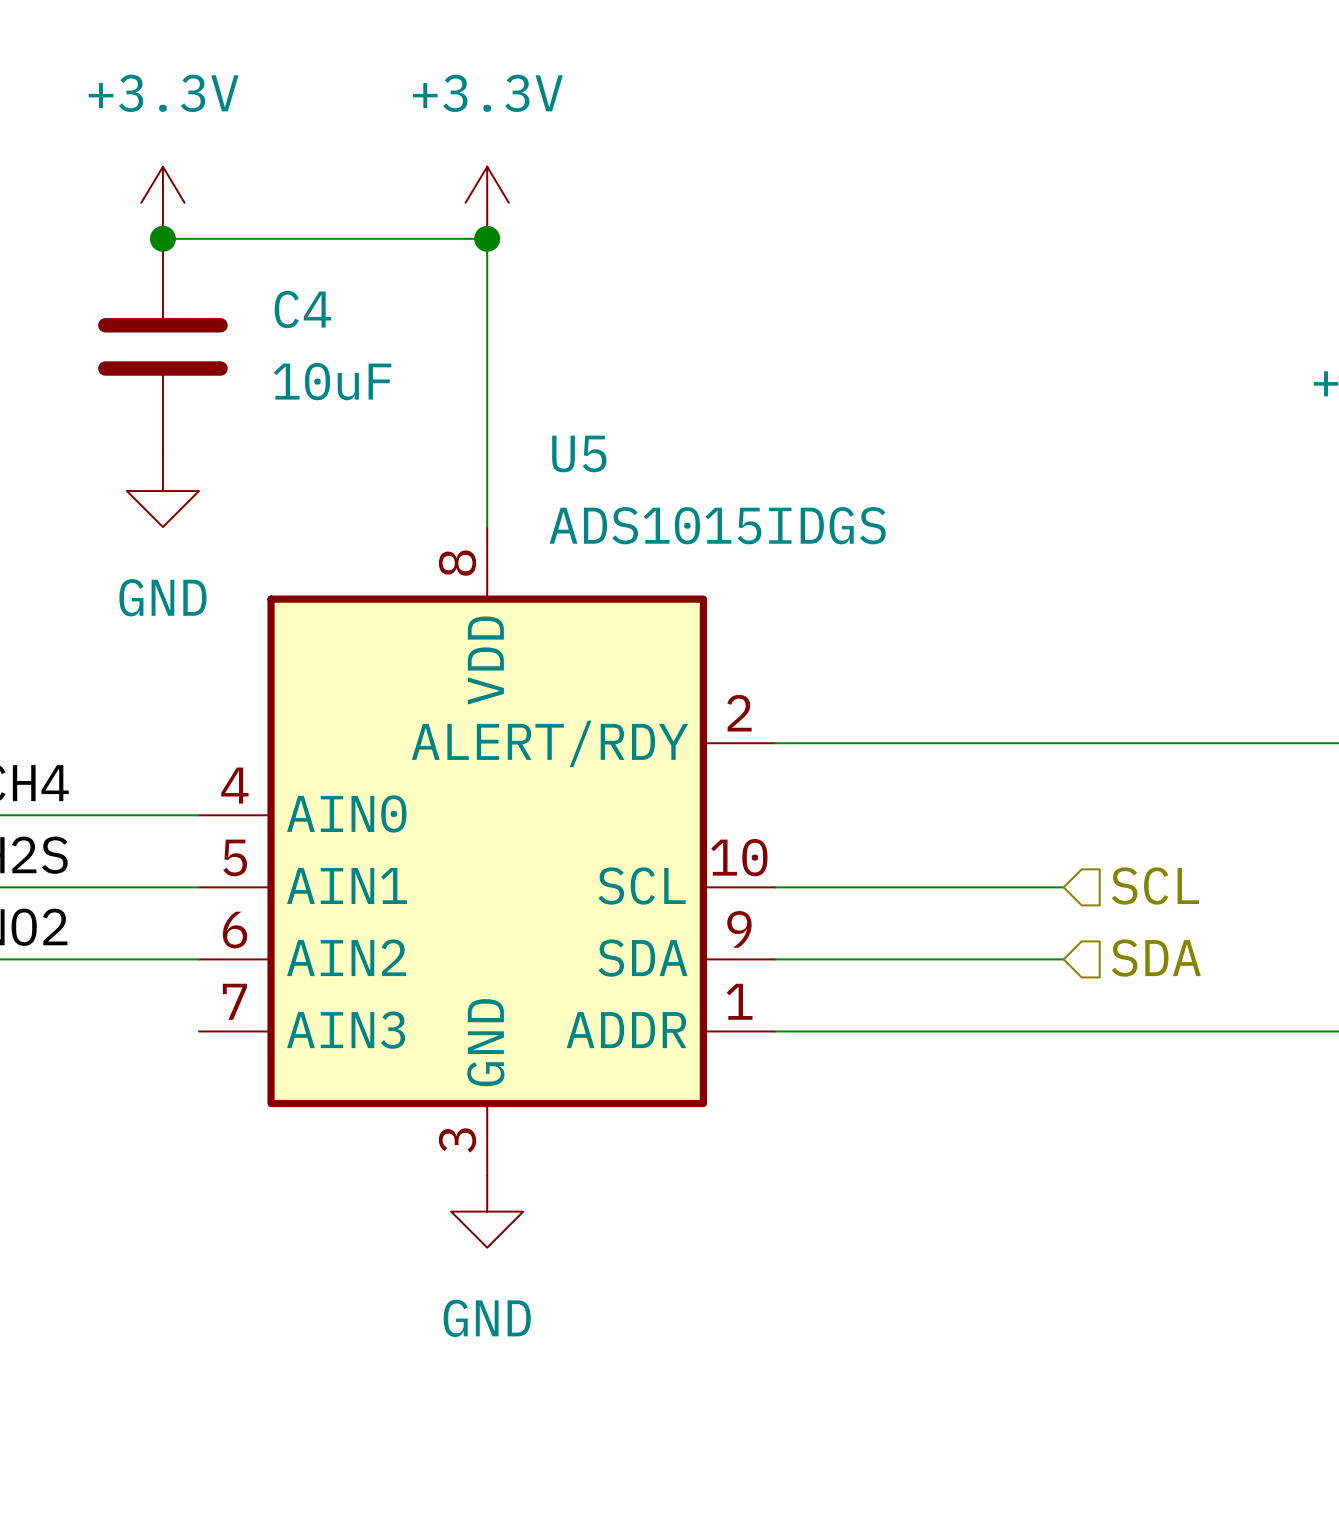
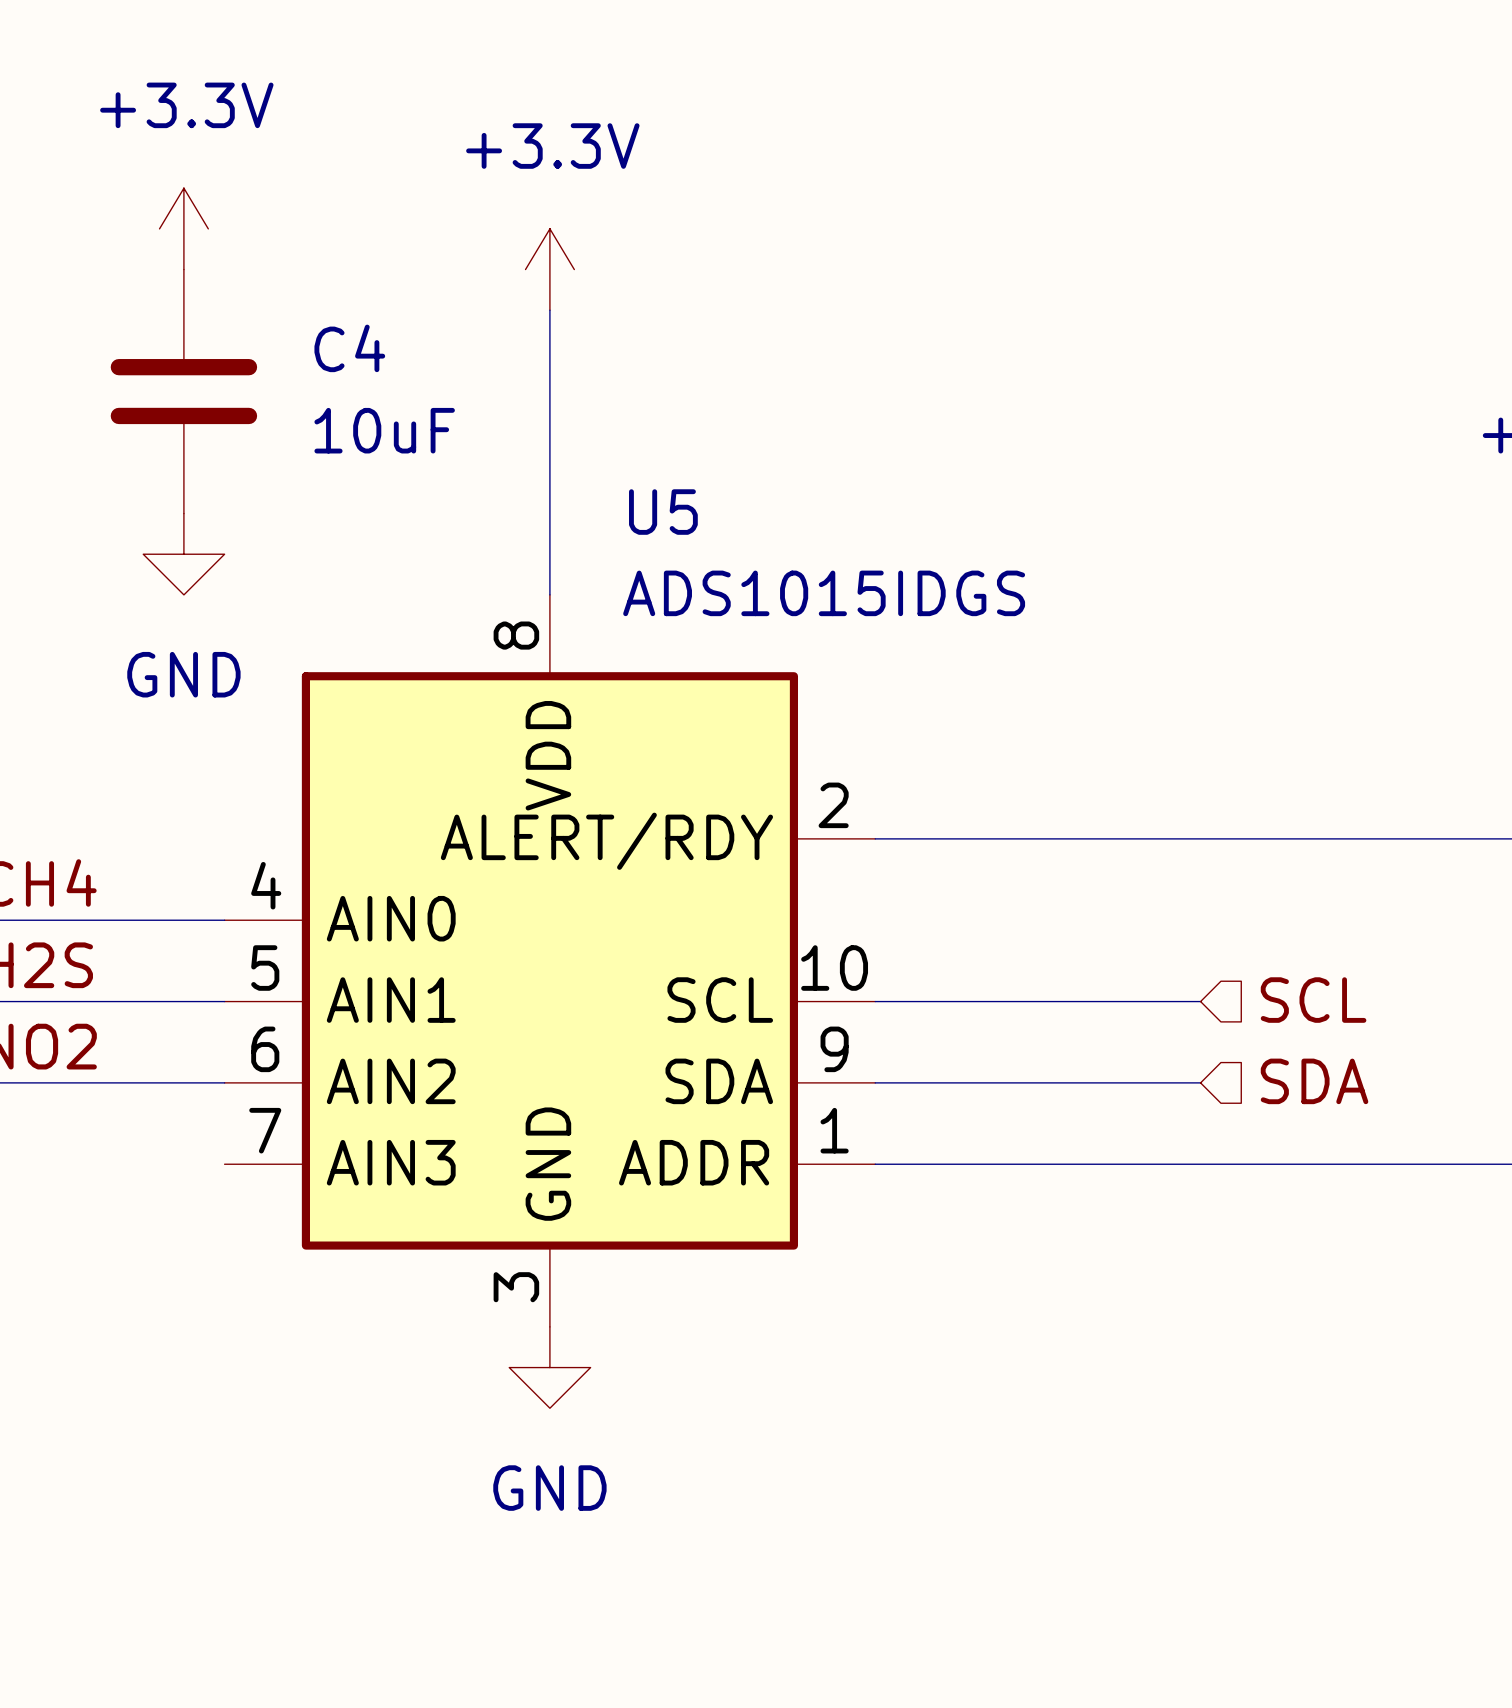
power symbol position: +3.3V (487, 202) -> +3.3V (549, 269)
wire: (162, 238) (487, 238) (487, 274) -> none
junction: (162, 238) -> none
junction: (487, 238) -> none

